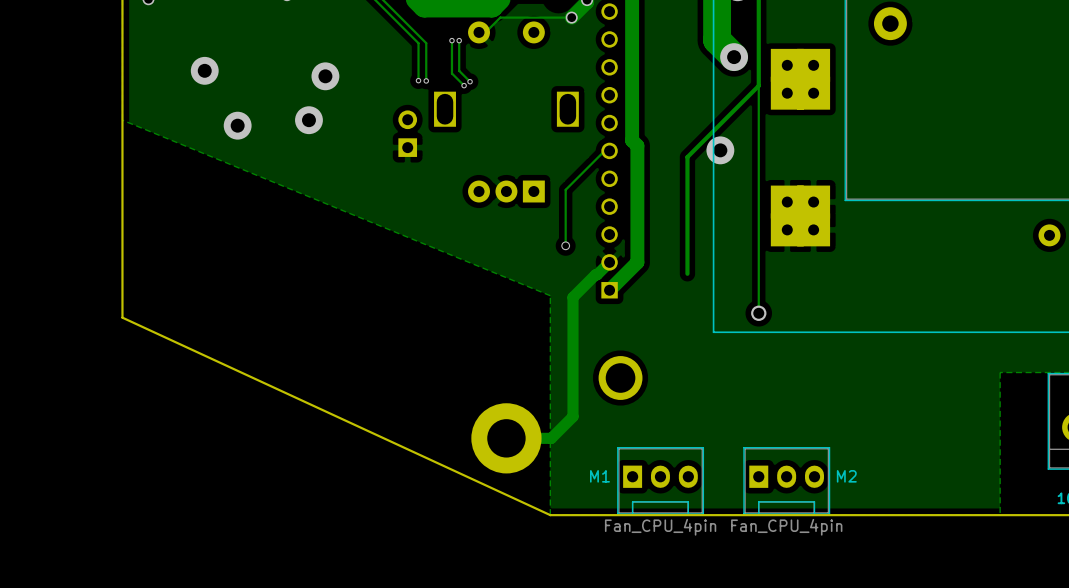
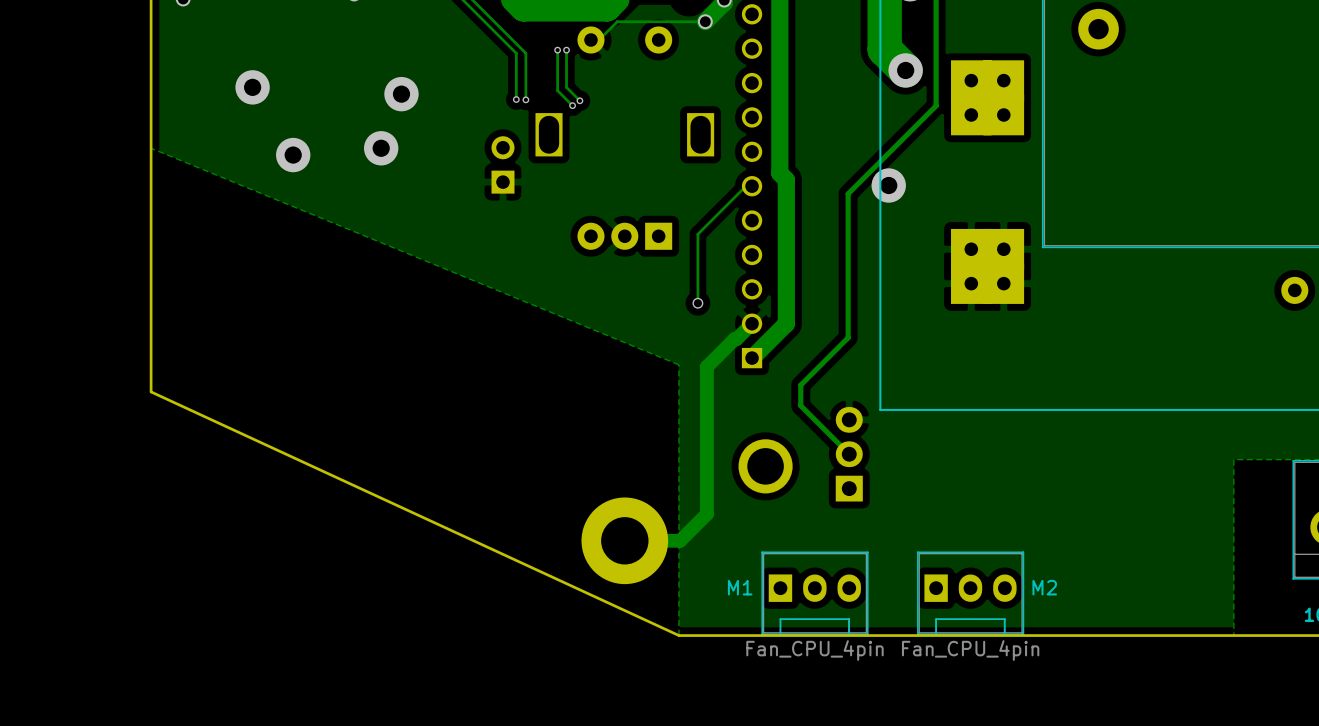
track: (758, 85) (758, 313) -> none
track: none -> (848, 337) (800, 385) (800, 405) (849, 454)
via: (758, 313) -> none
part: none -> (849, 454)

